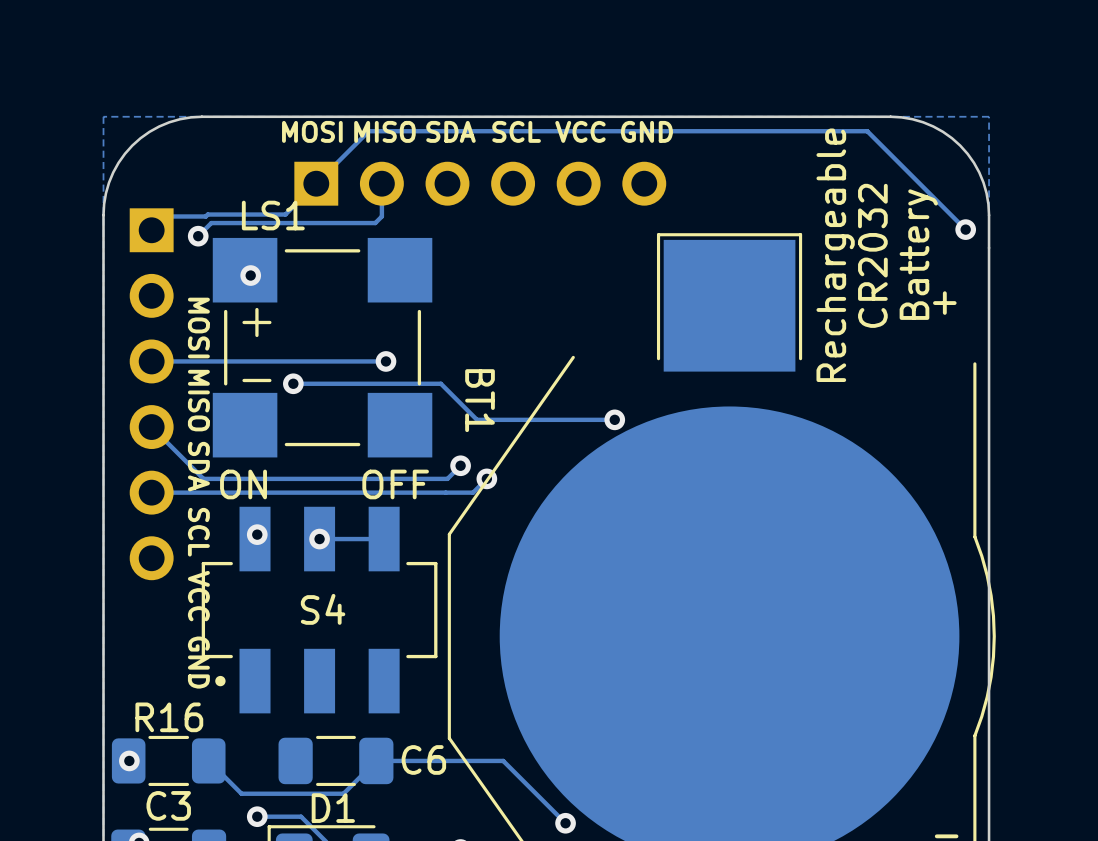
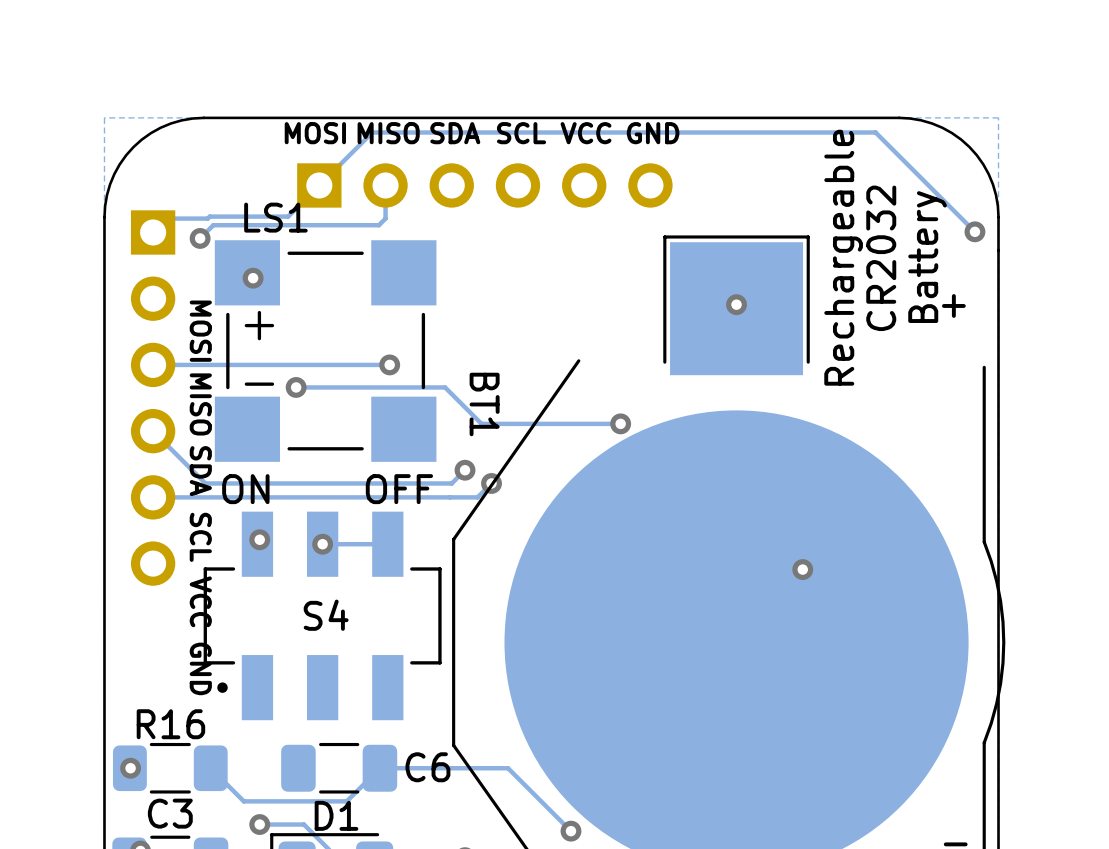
via: none -> (736, 304)
via: none -> (802, 569)

